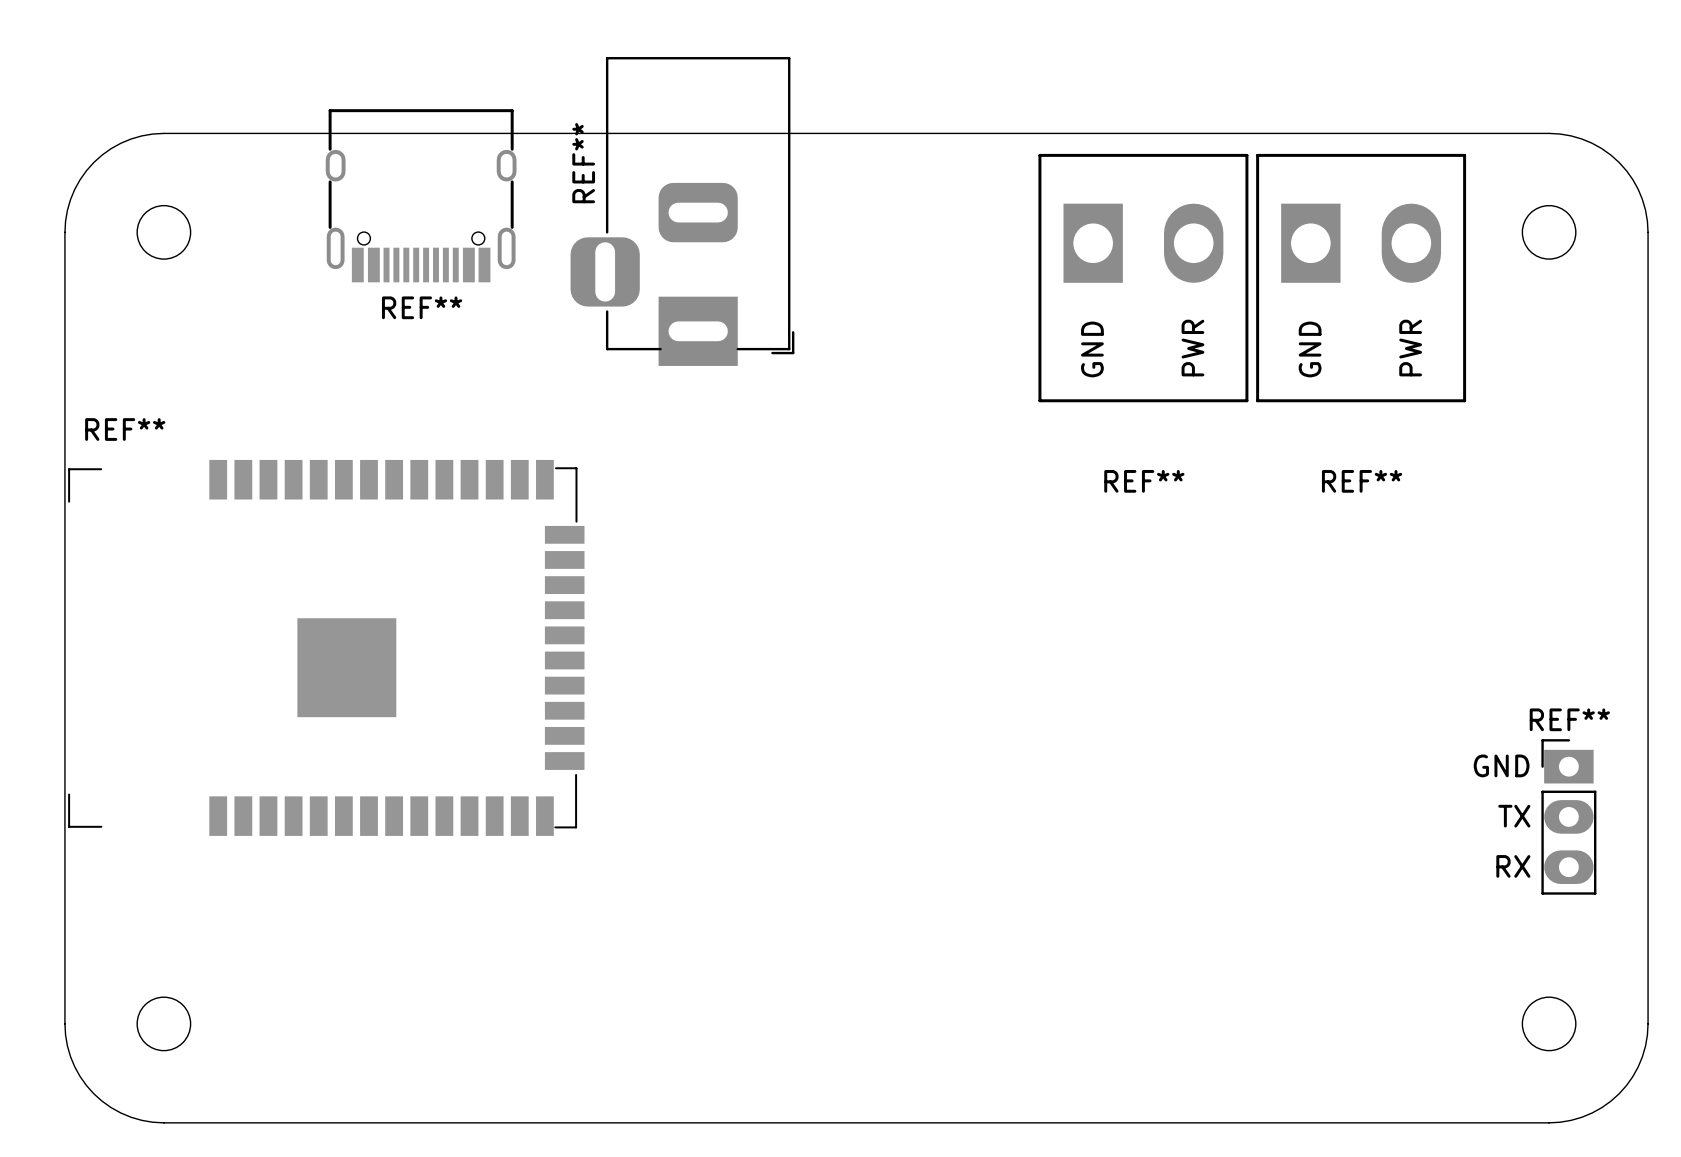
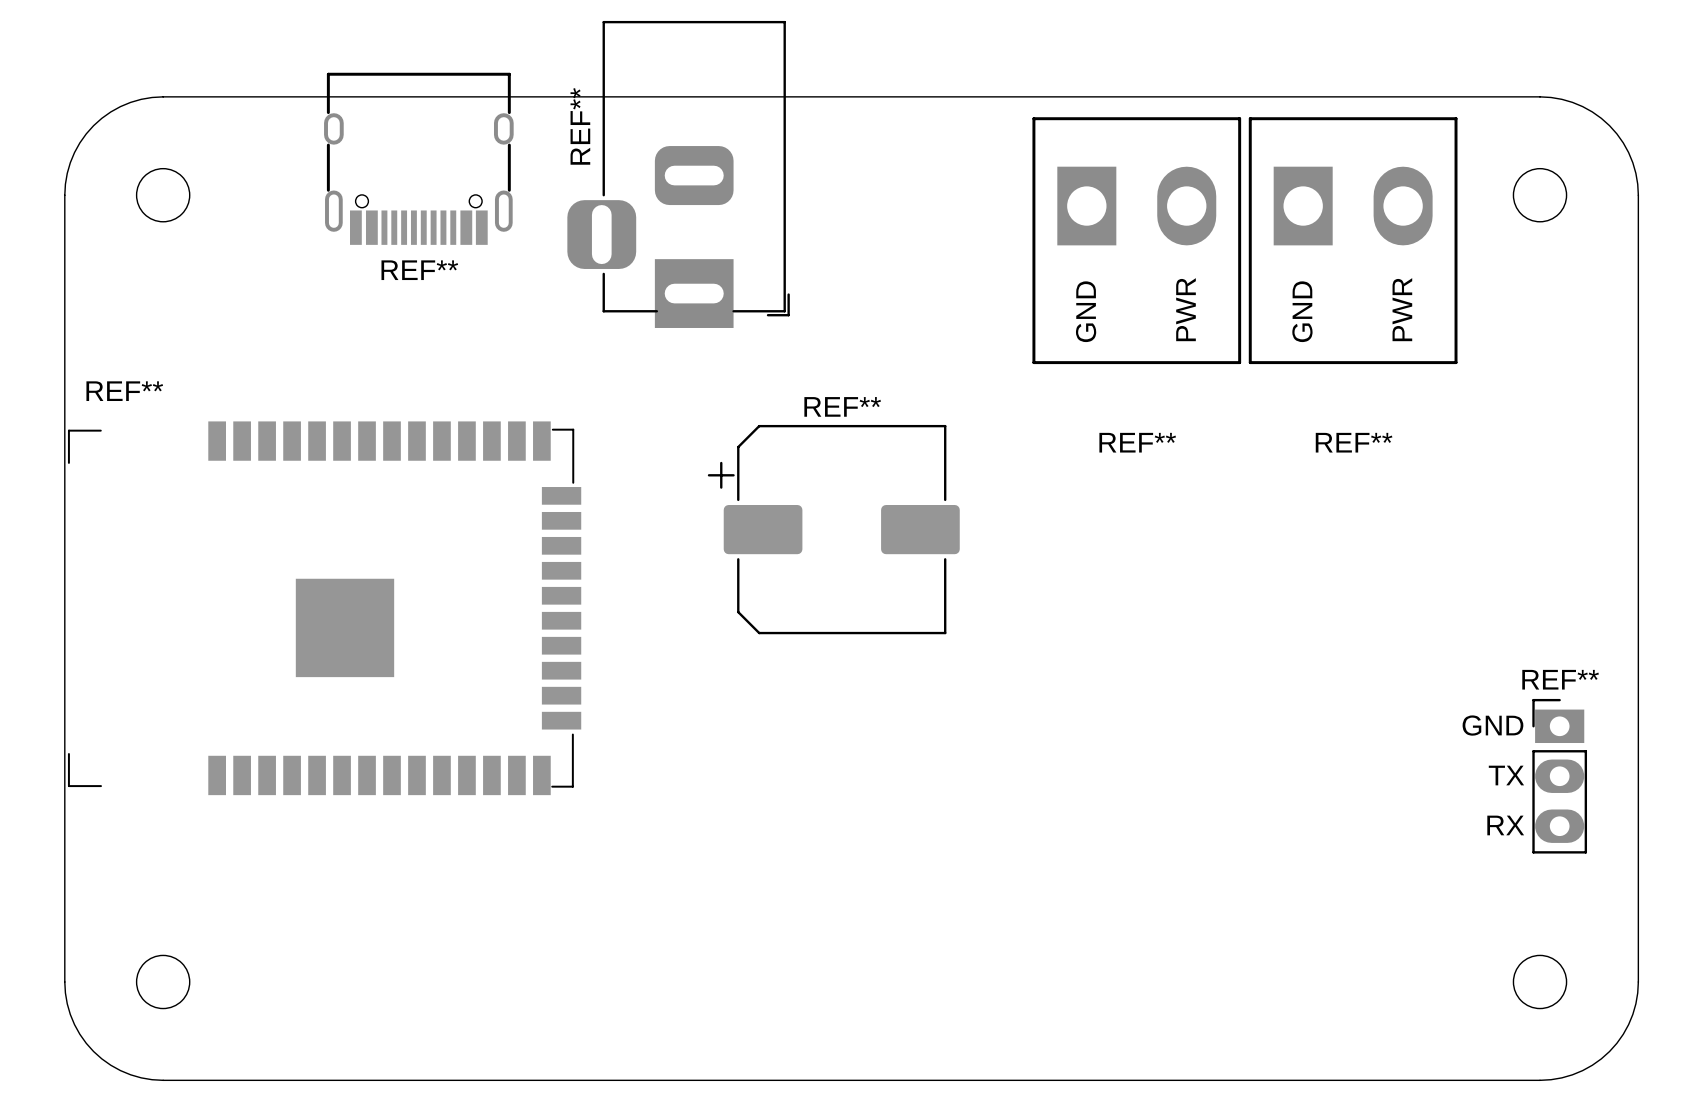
REF**: none -> (833, 529)

